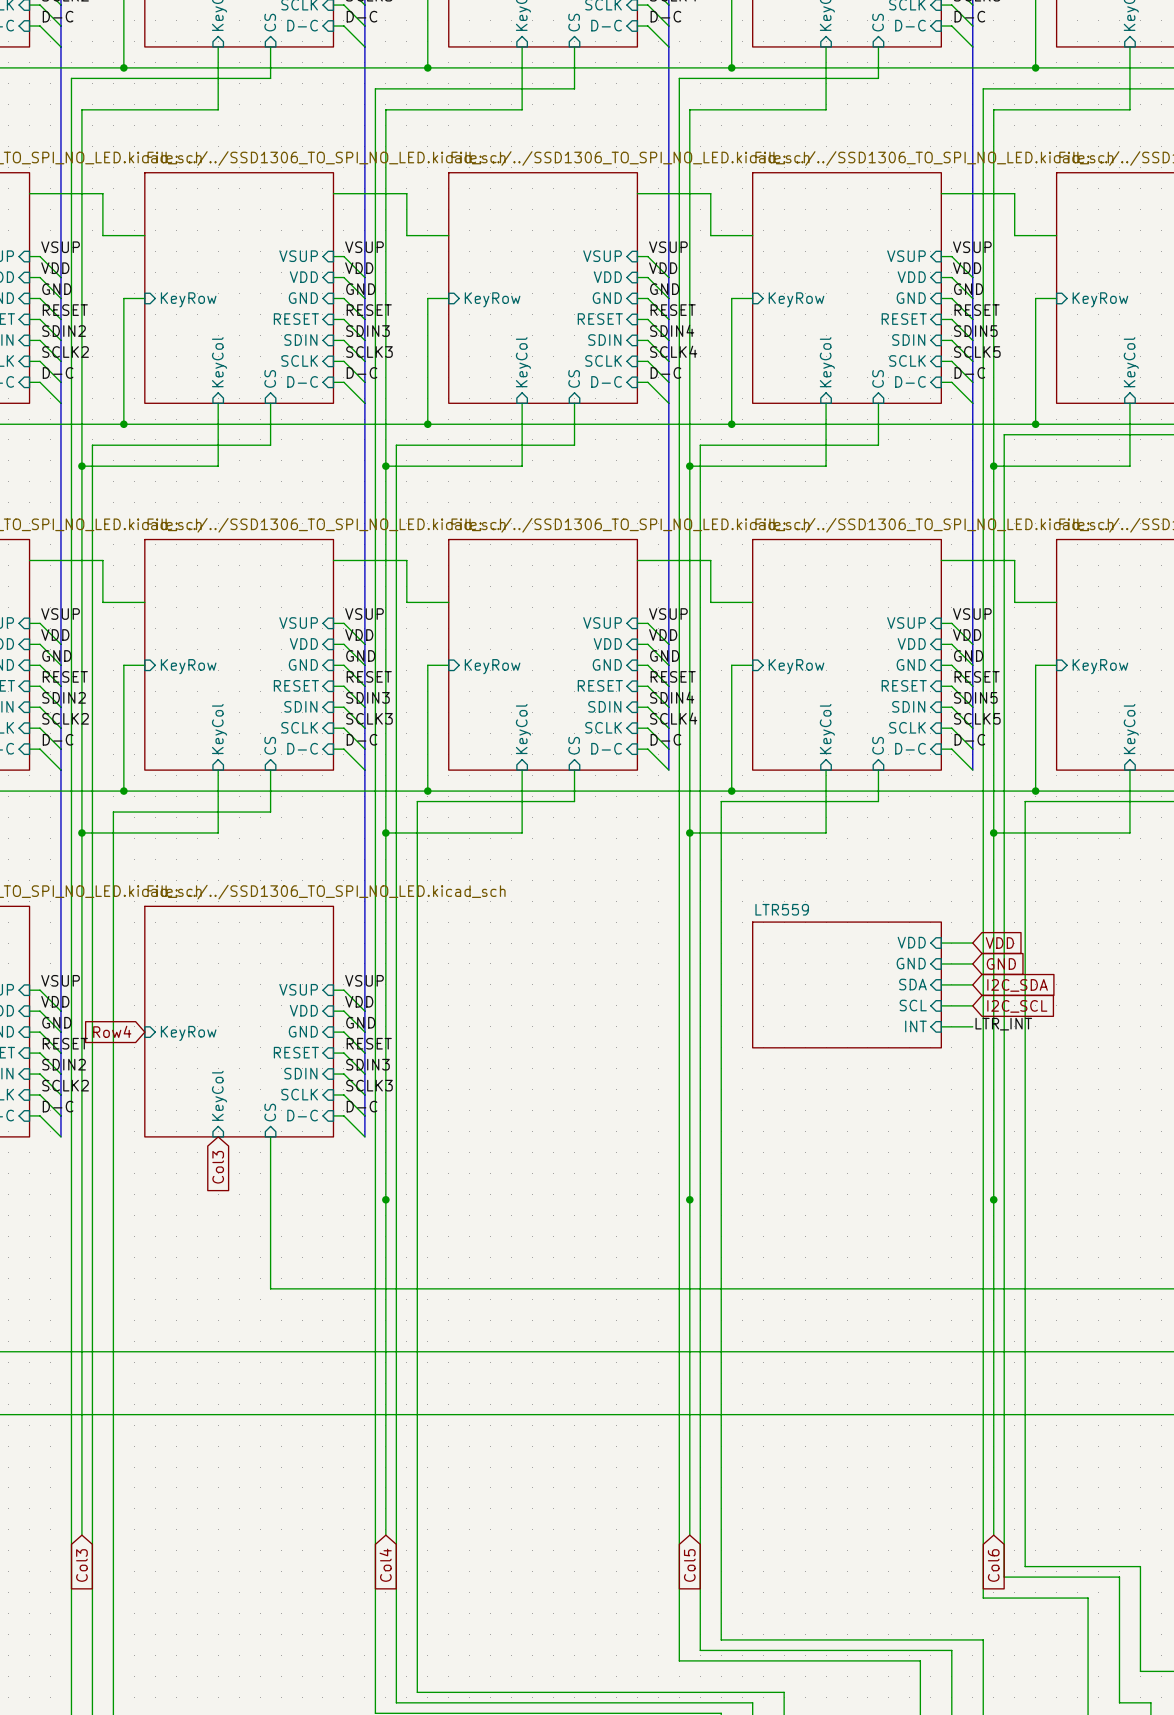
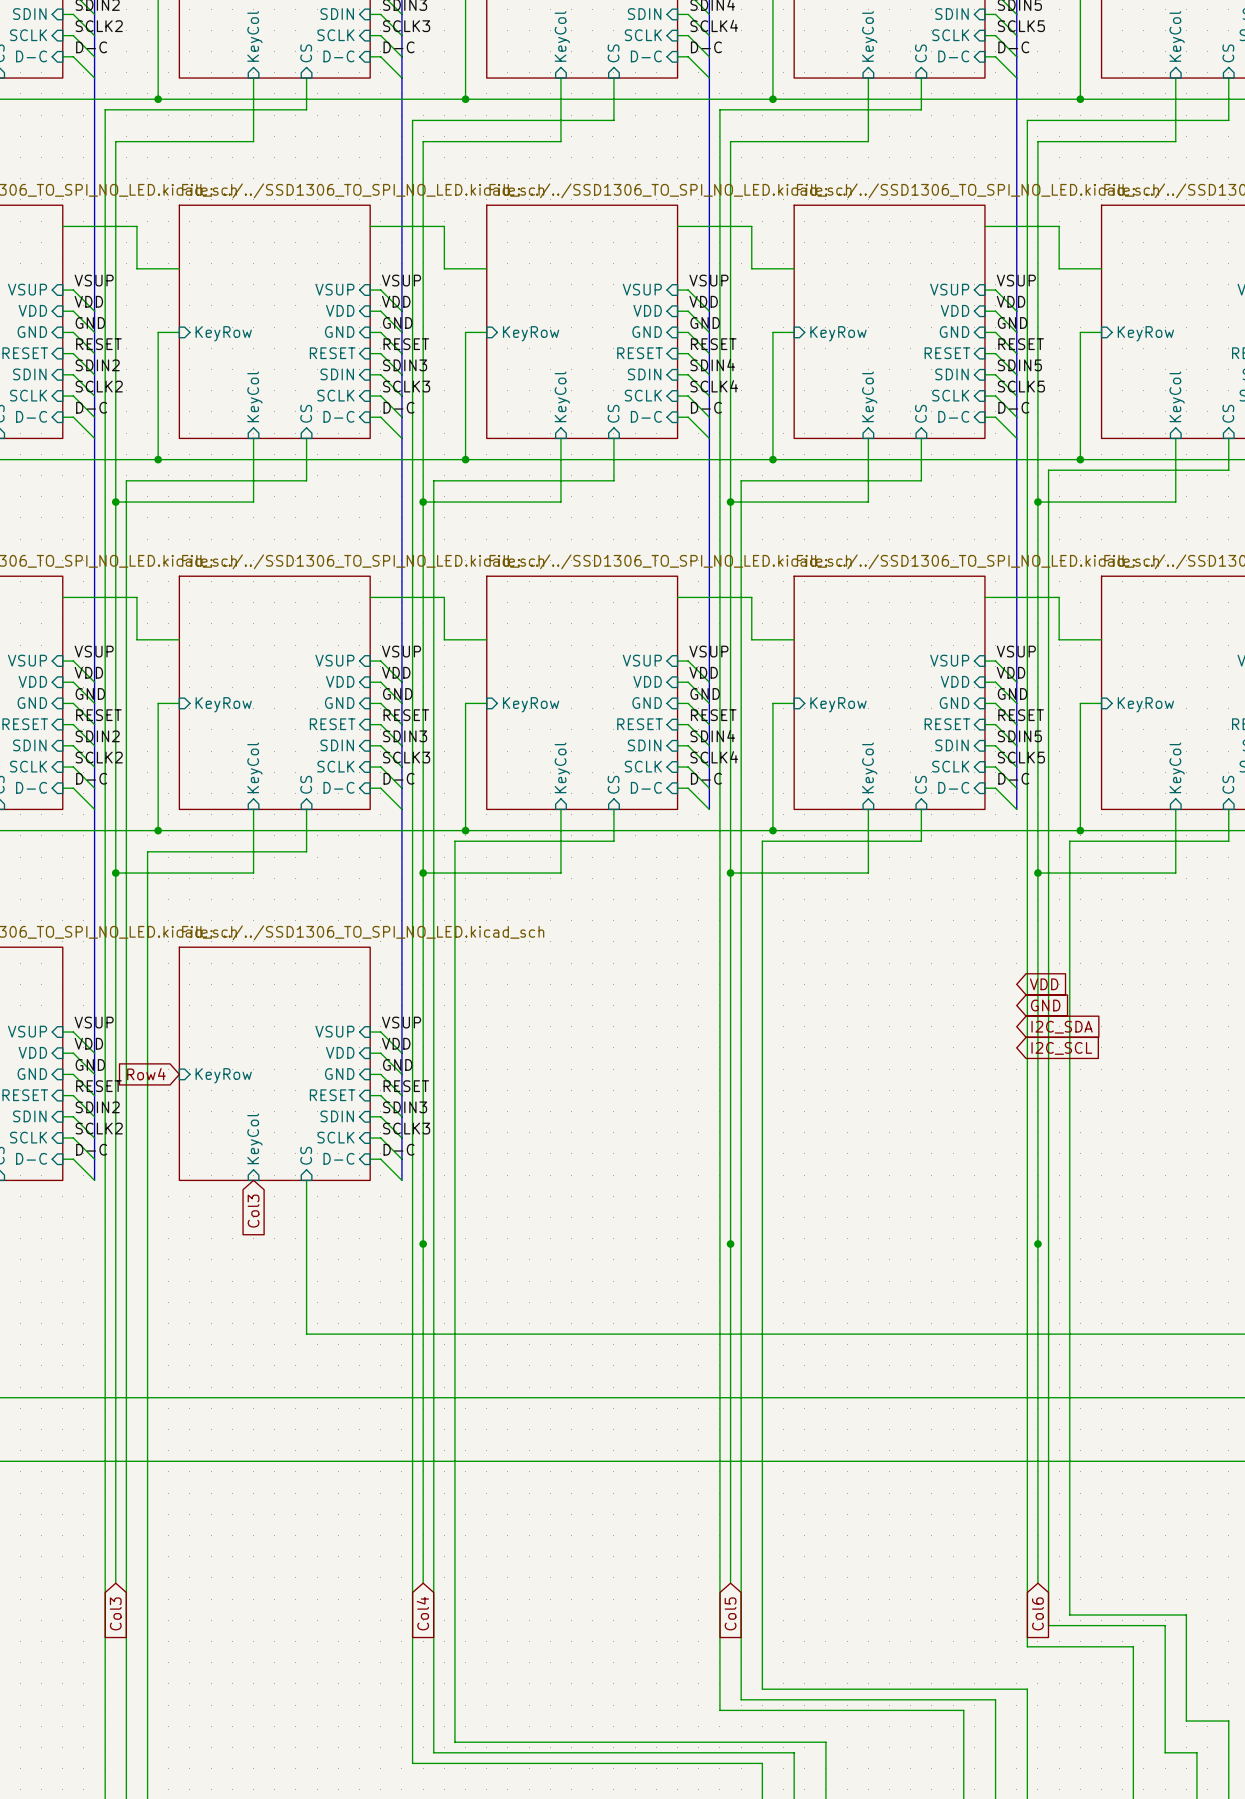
sheet pin: VDD (911, 942) -> none
wire: (941, 943) (972, 943) -> none
sheet pin: GND (911, 963) -> none
wire: (941, 963) (972, 963) -> none
sheet LTR559: (847, 984) -> none
sheet pin: SDA (912, 984) -> none
wire: (941, 984) (972, 984) -> none
sheet pin: SCL (913, 1005) -> none
wire: (941, 1005) (972, 1005) -> none
label: LTR_INT (1003, 1024) -> none
sheet pin: INT (915, 1026) -> none
wire: (941, 1026) (972, 1026) -> none

